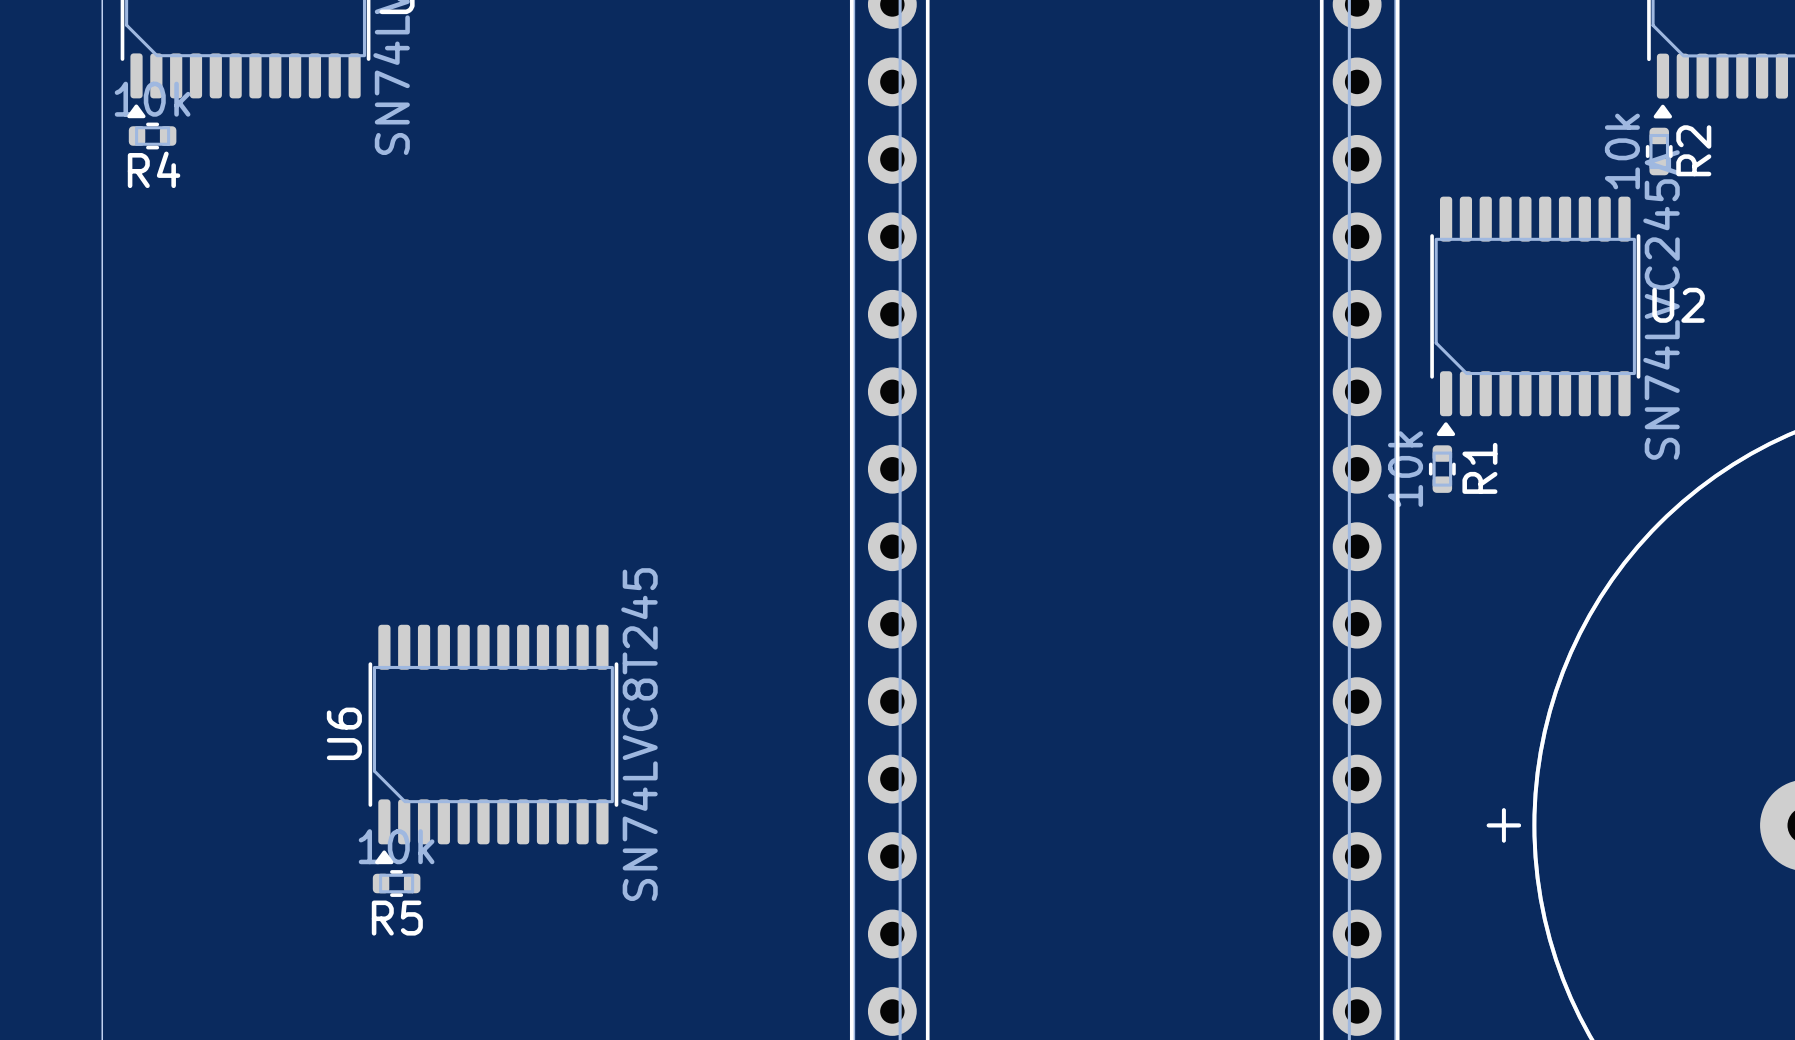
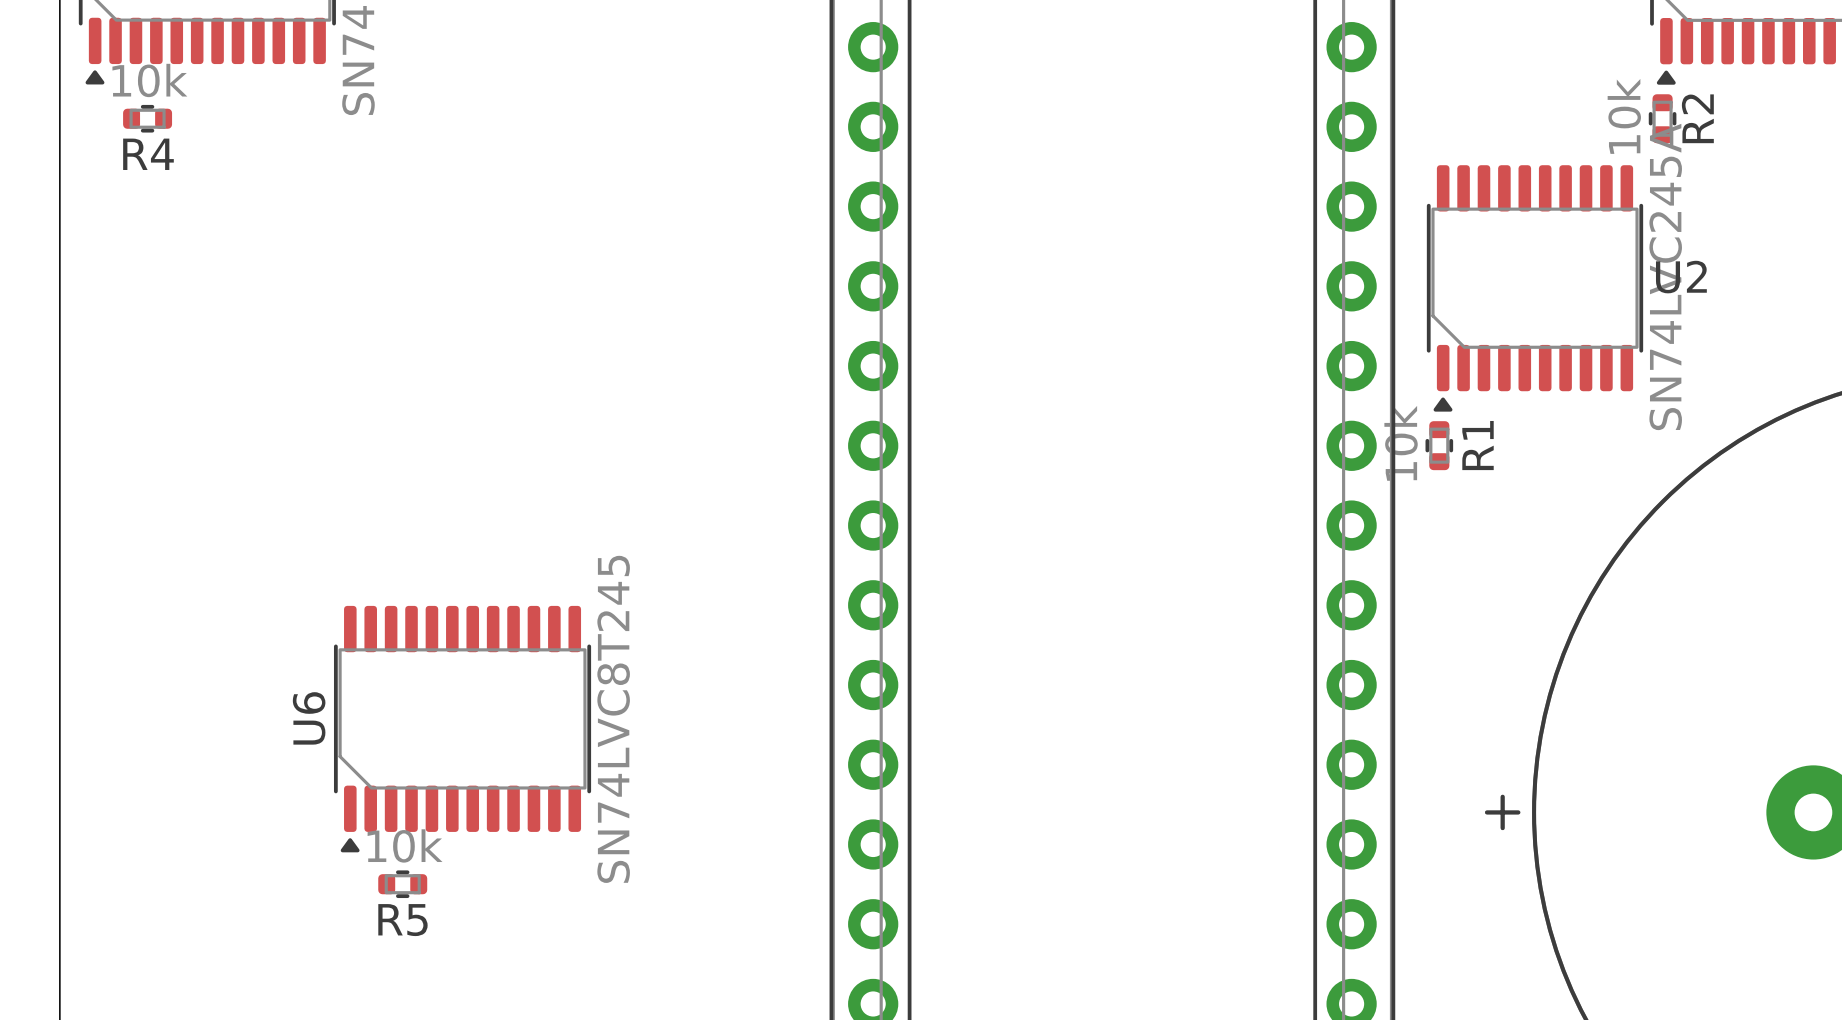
R4 position: (152, 136) -> (147, 118)
R5 position: (396, 883) -> (402, 884)

